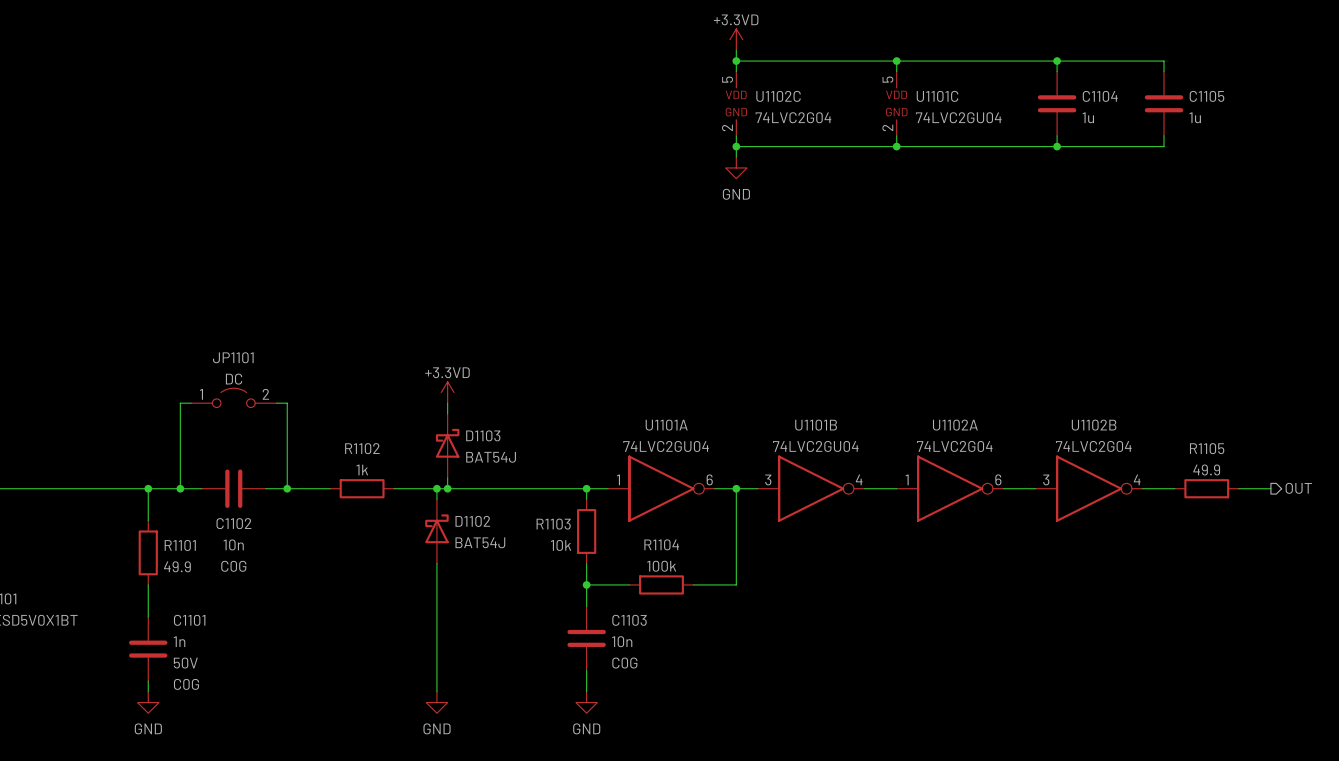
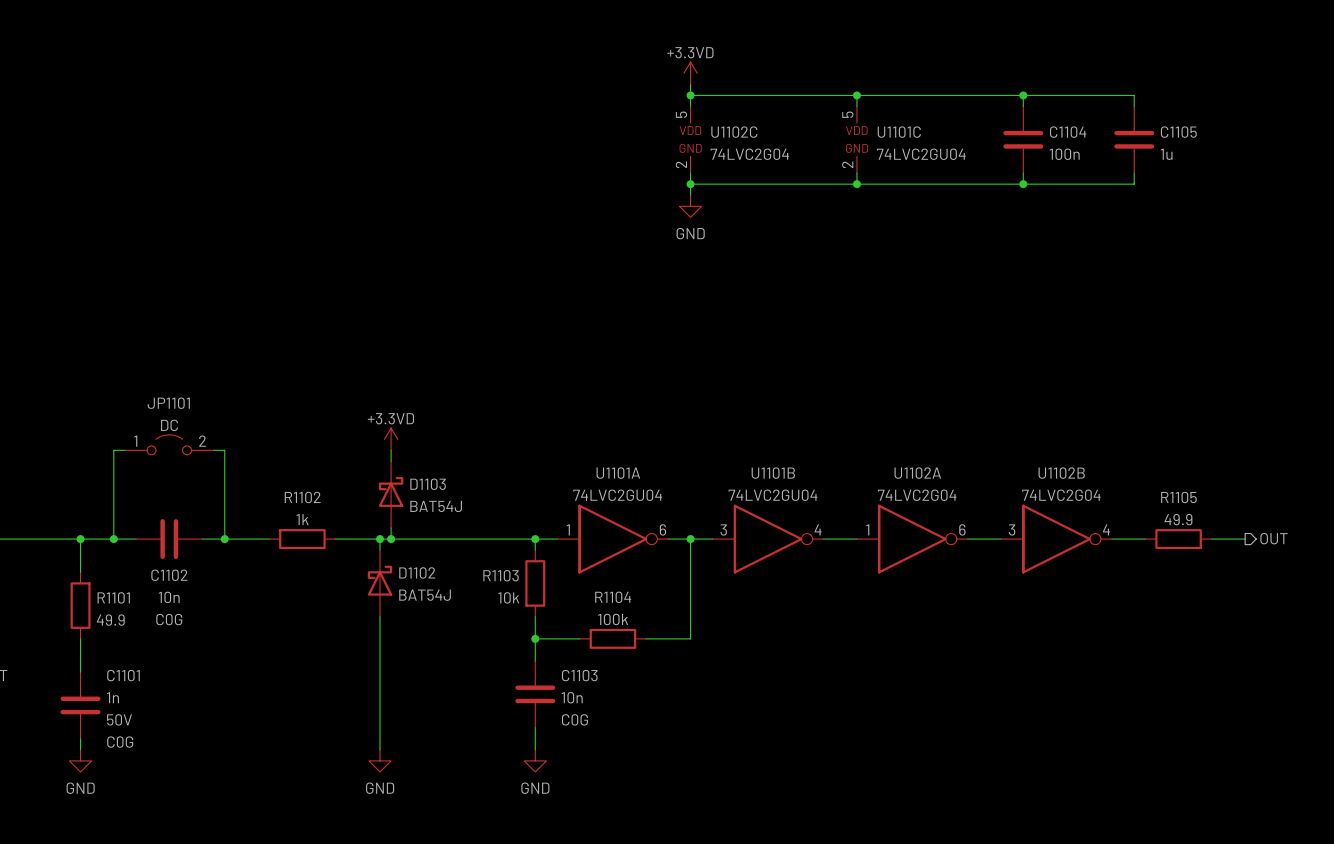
C1104 value: 1u (1088, 117) -> 100n (1064, 154)

